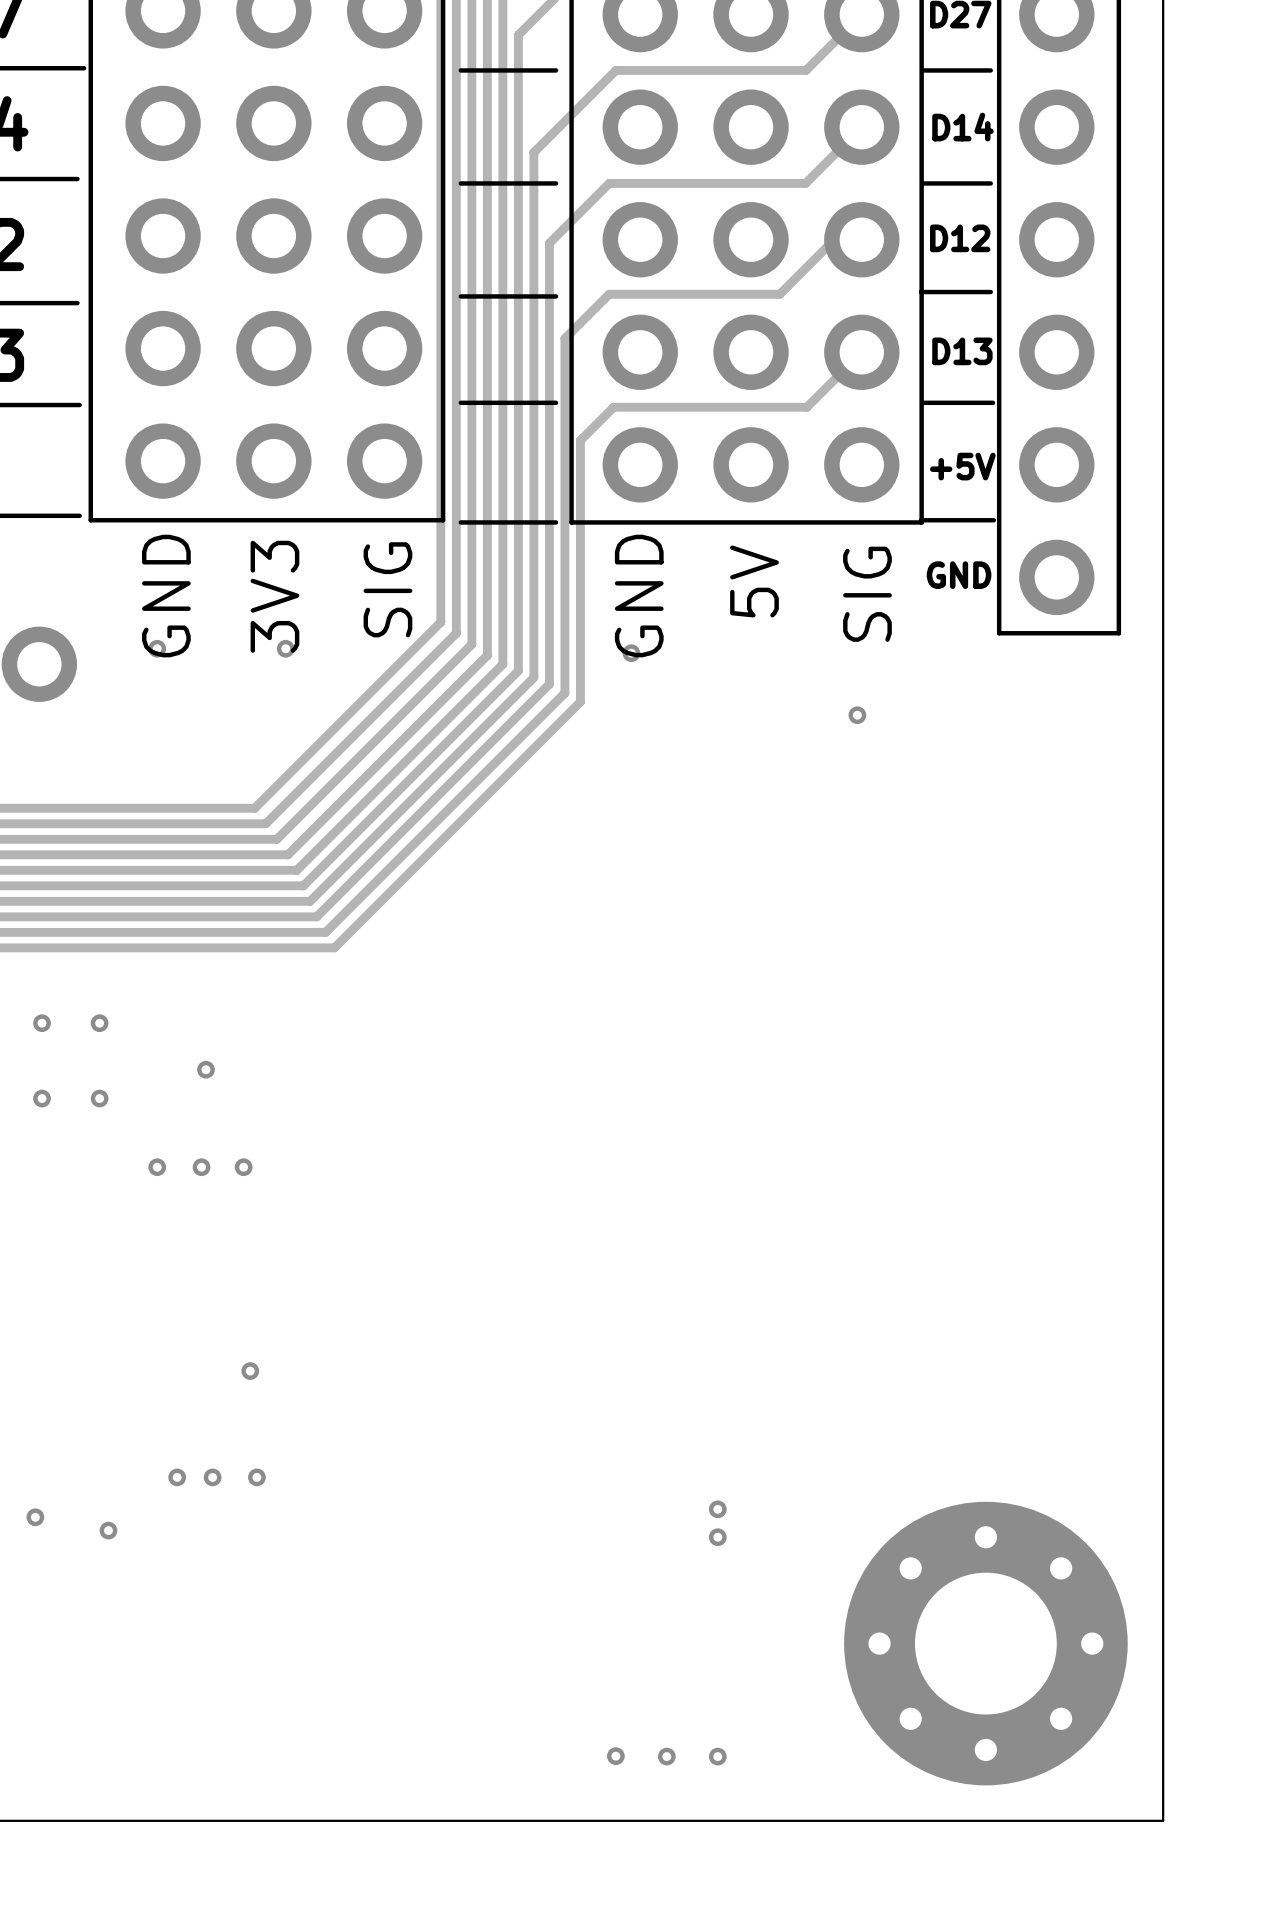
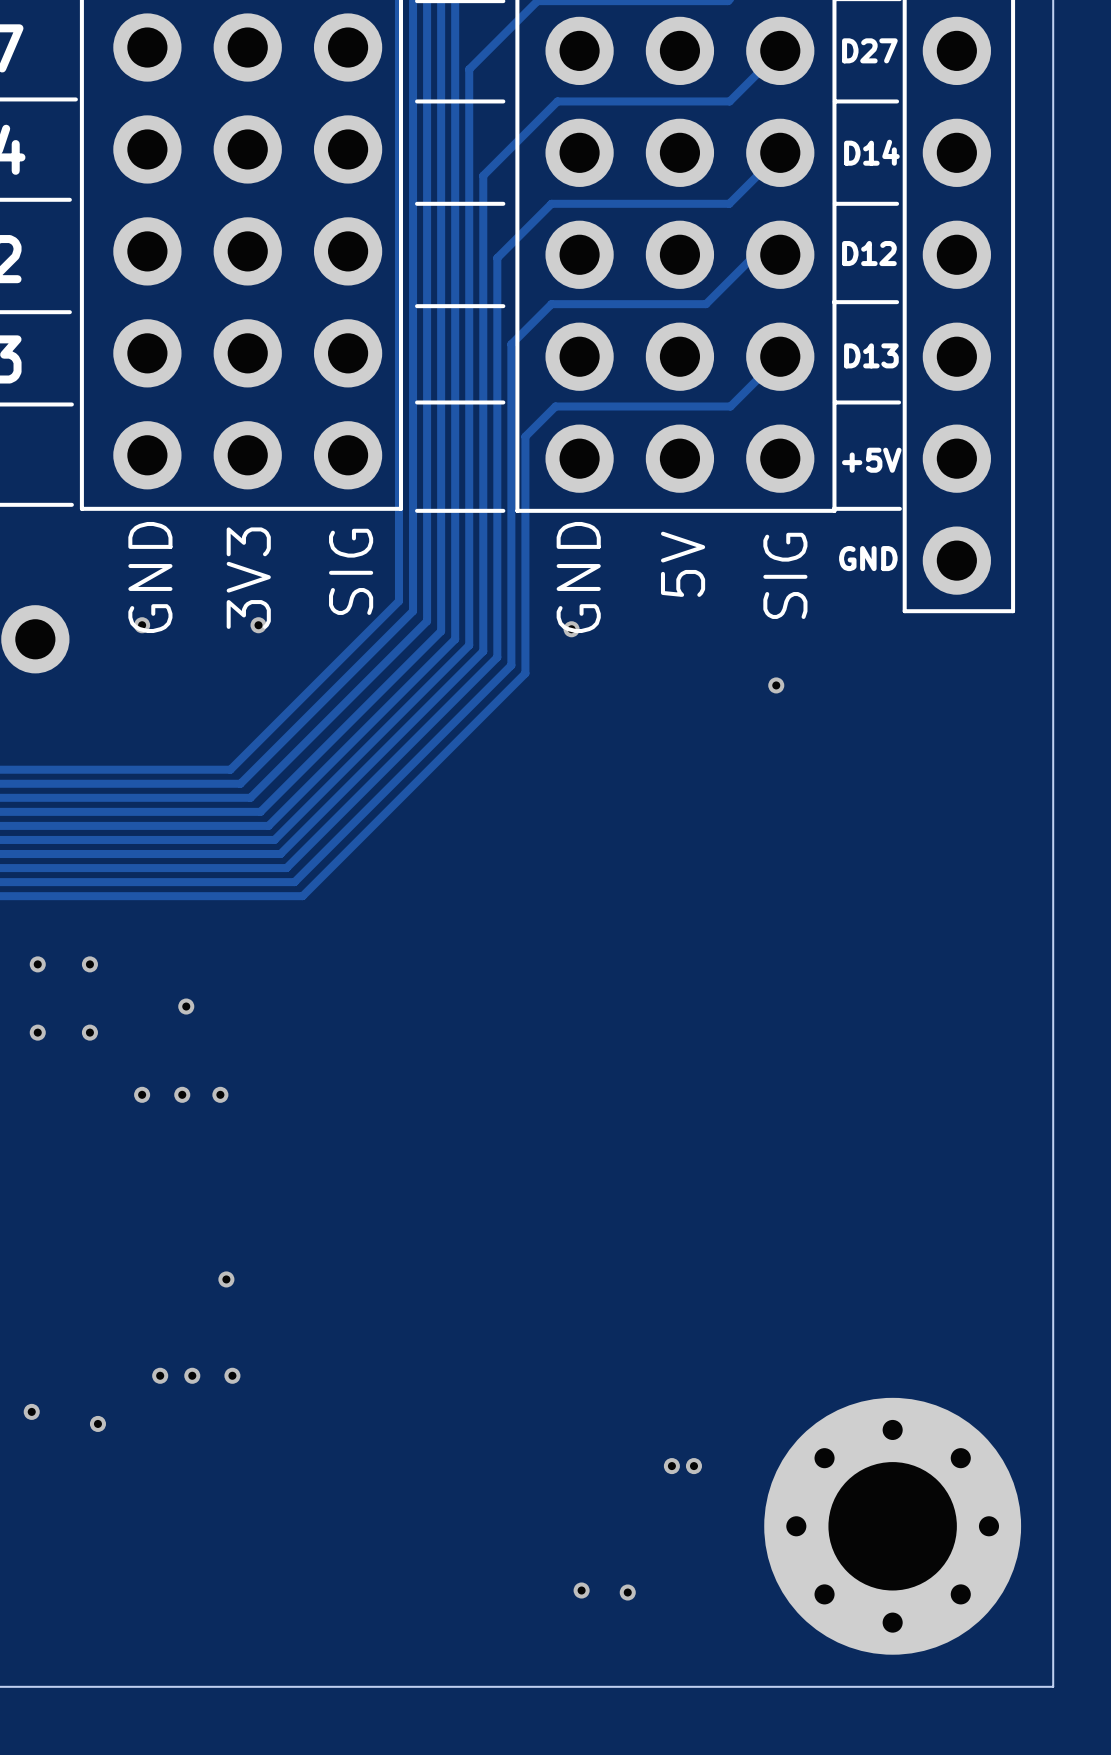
via: (717, 1509) -> none
via: (717, 1537) -> none
via: none -> (671, 1466)
via: none -> (693, 1466)
via: none -> (581, 1590)
via: none -> (627, 1592)
via: (615, 1756) -> none
via: (666, 1756) -> none
via: (717, 1756) -> none

